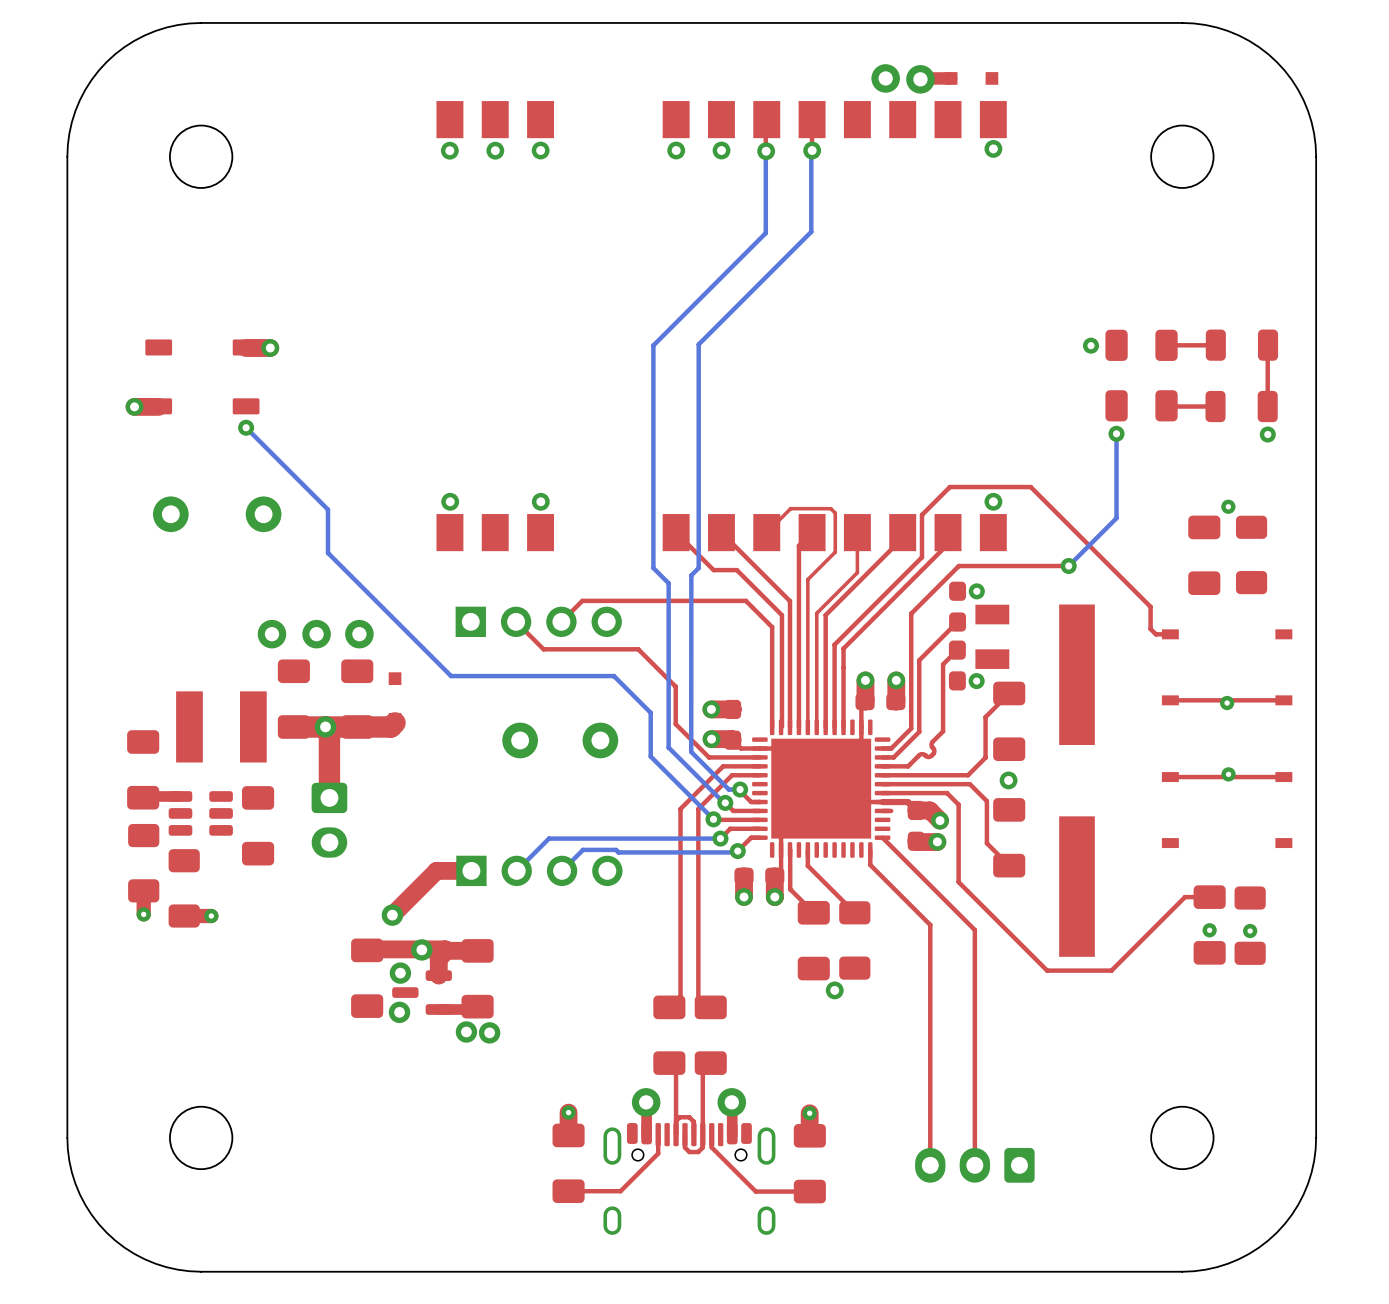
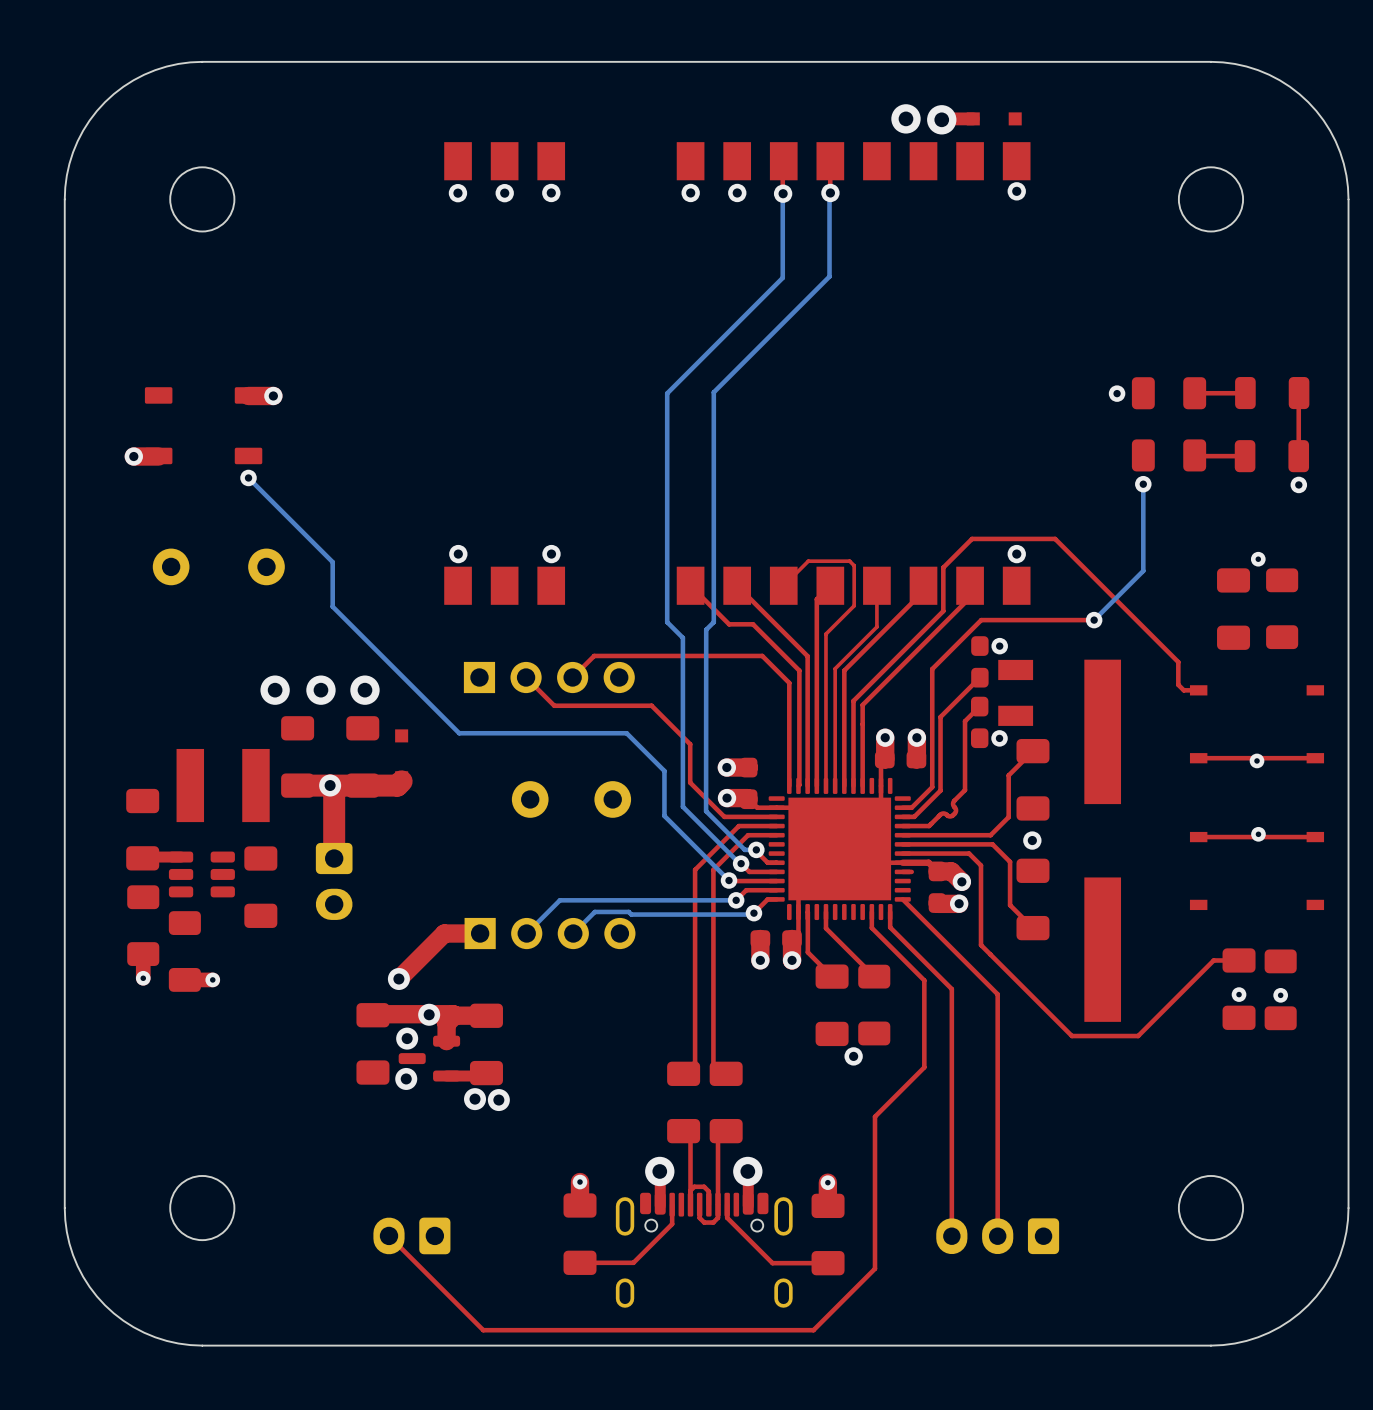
top track: none -> (871, 912) (871, 927) (924, 980) (924, 1067) (874, 1116) (874, 1268) (813, 1330) (483, 1330) (389, 1235)
part: none -> (411, 1235)

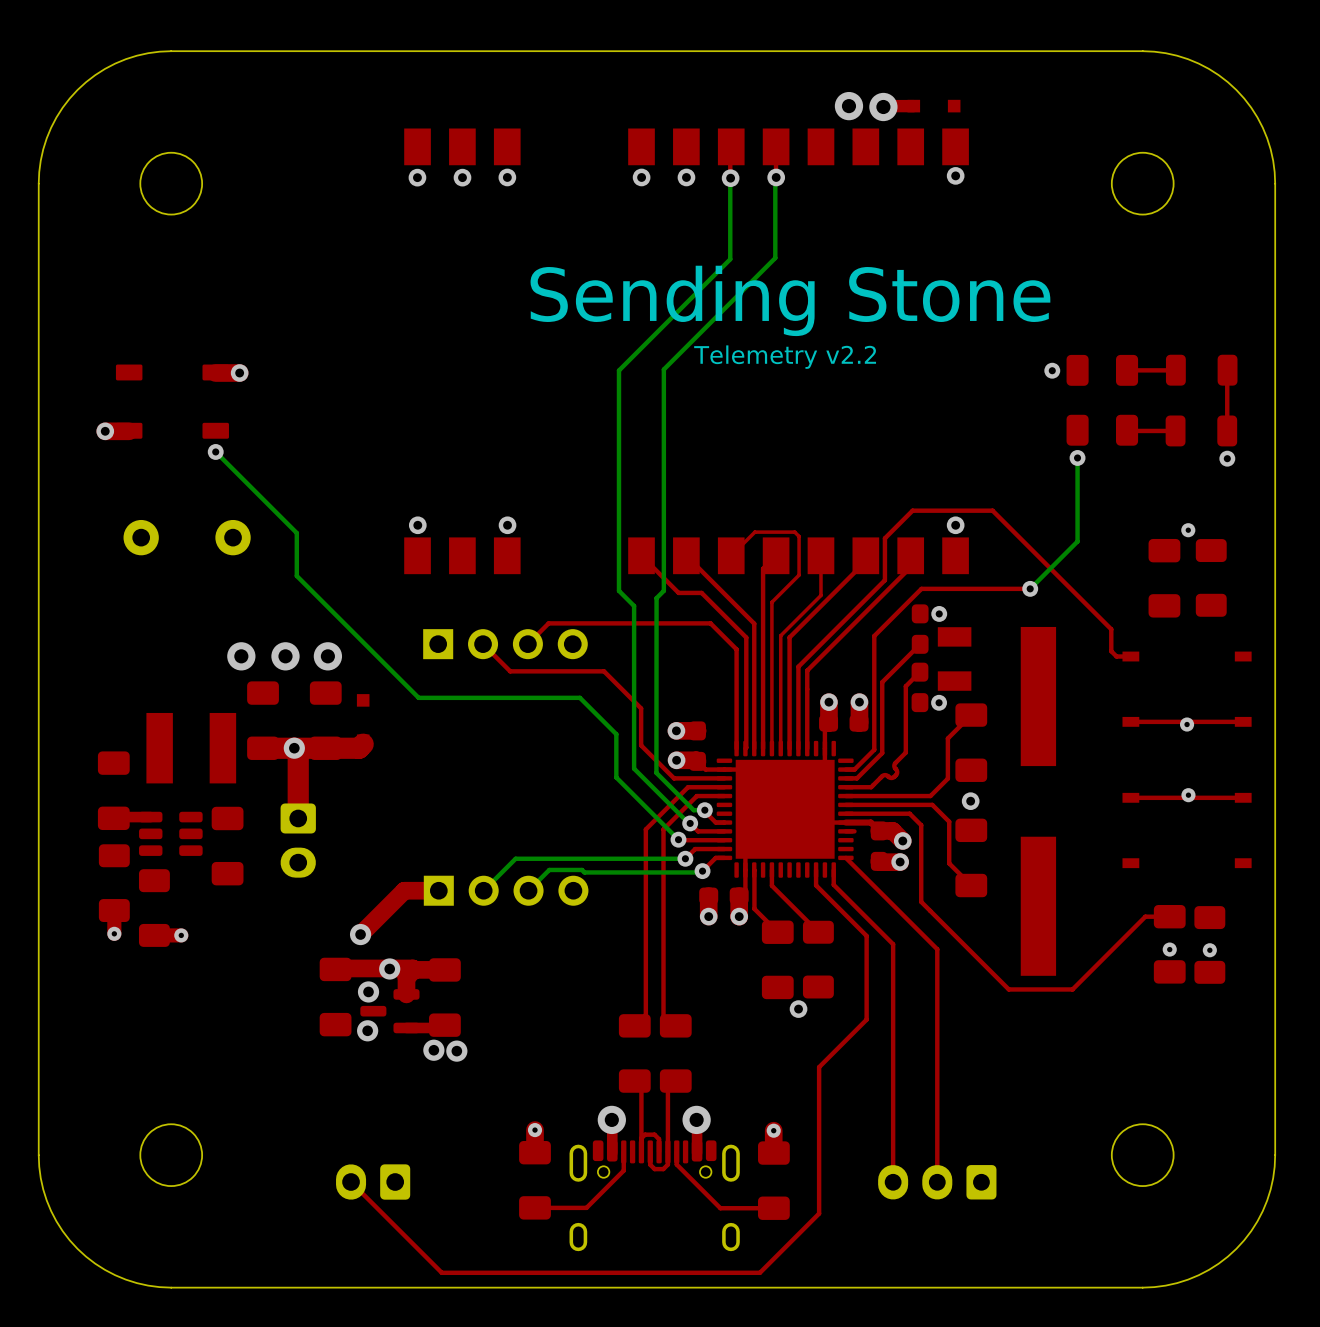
text: none -> Sending Stone (790, 300)
text: none -> Telemetry v2.2 (785, 357)
part: (530, 799) -> none
part: (612, 799) -> none

